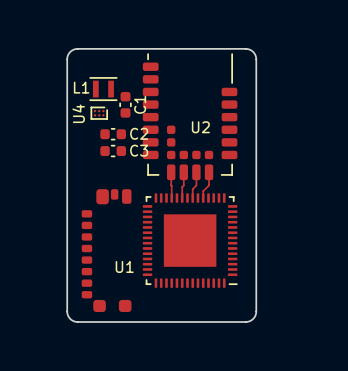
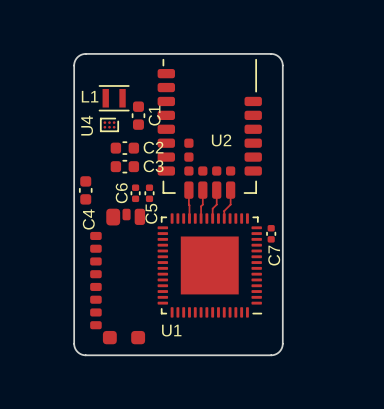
C4: none -> (85, 190)
C6: none -> (135, 193)
C5: none -> (149, 193)
C7: none -> (271, 233)
U1 name position: U1 (124, 266) -> U1 (171, 330)

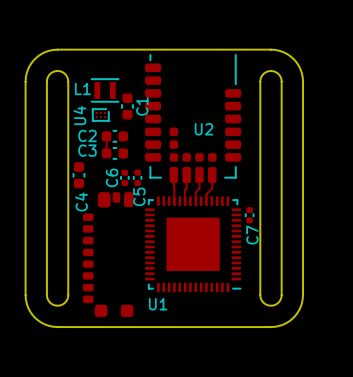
board edge: (85, 53) (78, 56) (74, 61) (74, 88) -> (78, 49) (53, 49) (41, 53) (29, 65) (25, 81) (26, 303) (32, 314) (45, 324) (53, 326) (78, 327)
board edge: (271, 53) (278, 56) (282, 61) (282, 88) -> (249, 49) (275, 49) (286, 53) (298, 65) (302, 81) (301, 303) (296, 314) (283, 324) (275, 326) (249, 327)
C2 name position: C2 (153, 147) -> C2 (87, 135)
track: none -> (106, 136) (106, 153)
C3 name position: C3 (153, 166) -> C3 (87, 150)
board edge: (74, 320) (74, 347) (78, 352) (85, 355) -> (68, 295) (65, 302) (57, 305) (50, 302) (46, 295) (47, 80) (51, 73) (57, 70) (65, 74) (68, 81)
board edge: (282, 320) (282, 347) (278, 352) (271, 355) -> (260, 295) (263, 302) (270, 305) (278, 302) (281, 295) (281, 80) (277, 73) (270, 70) (263, 74) (260, 81)

